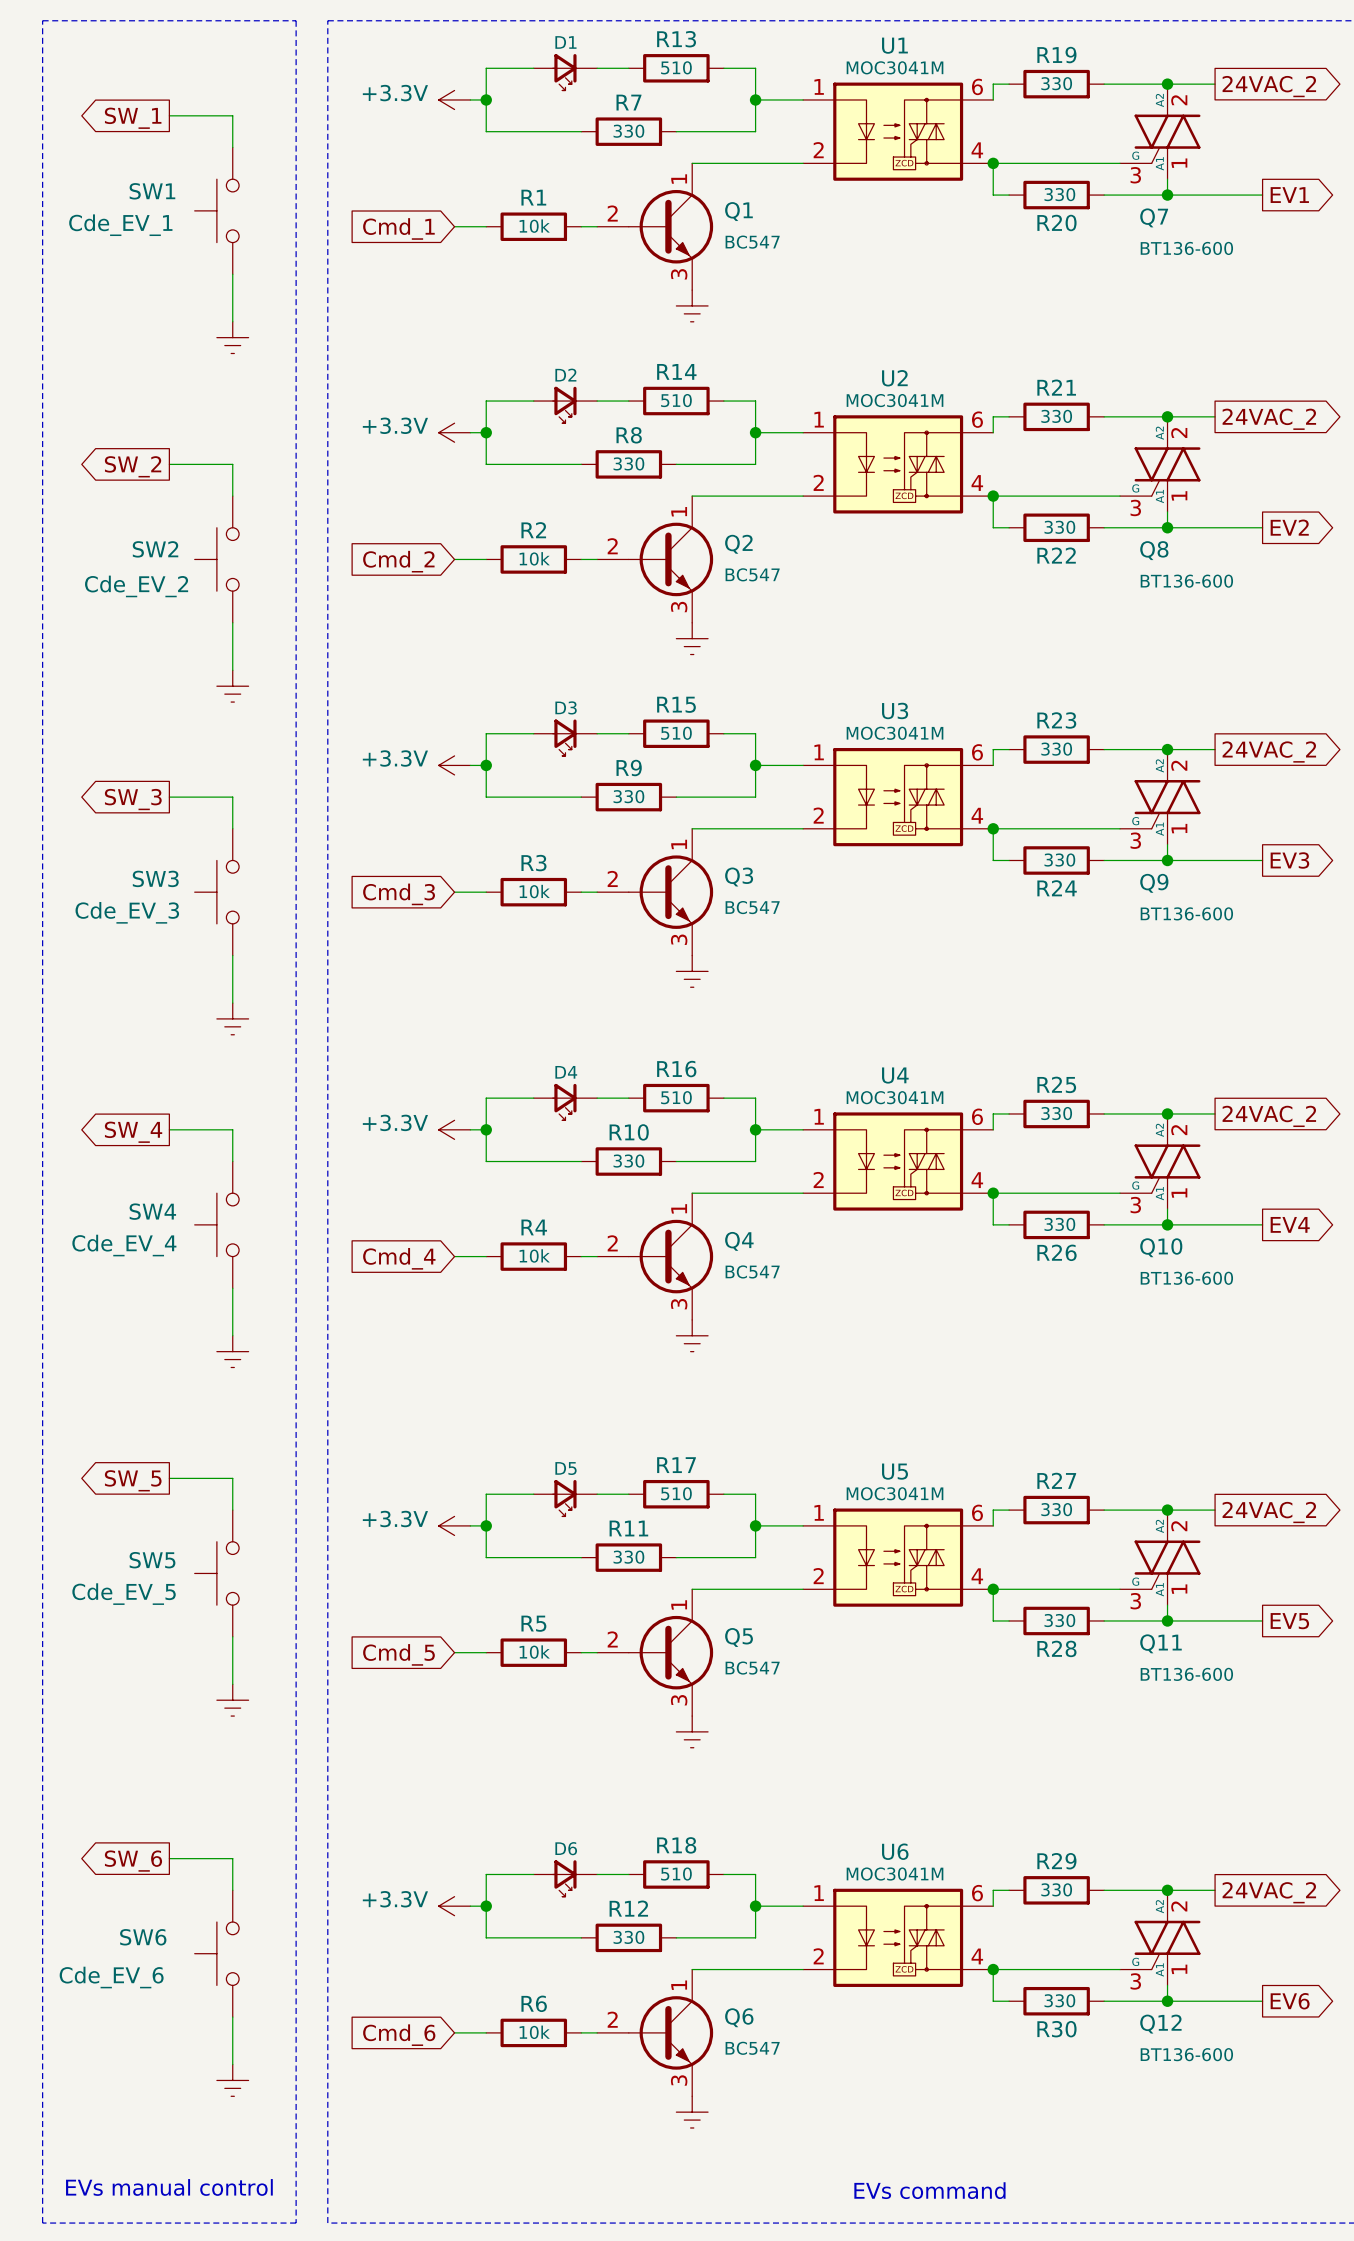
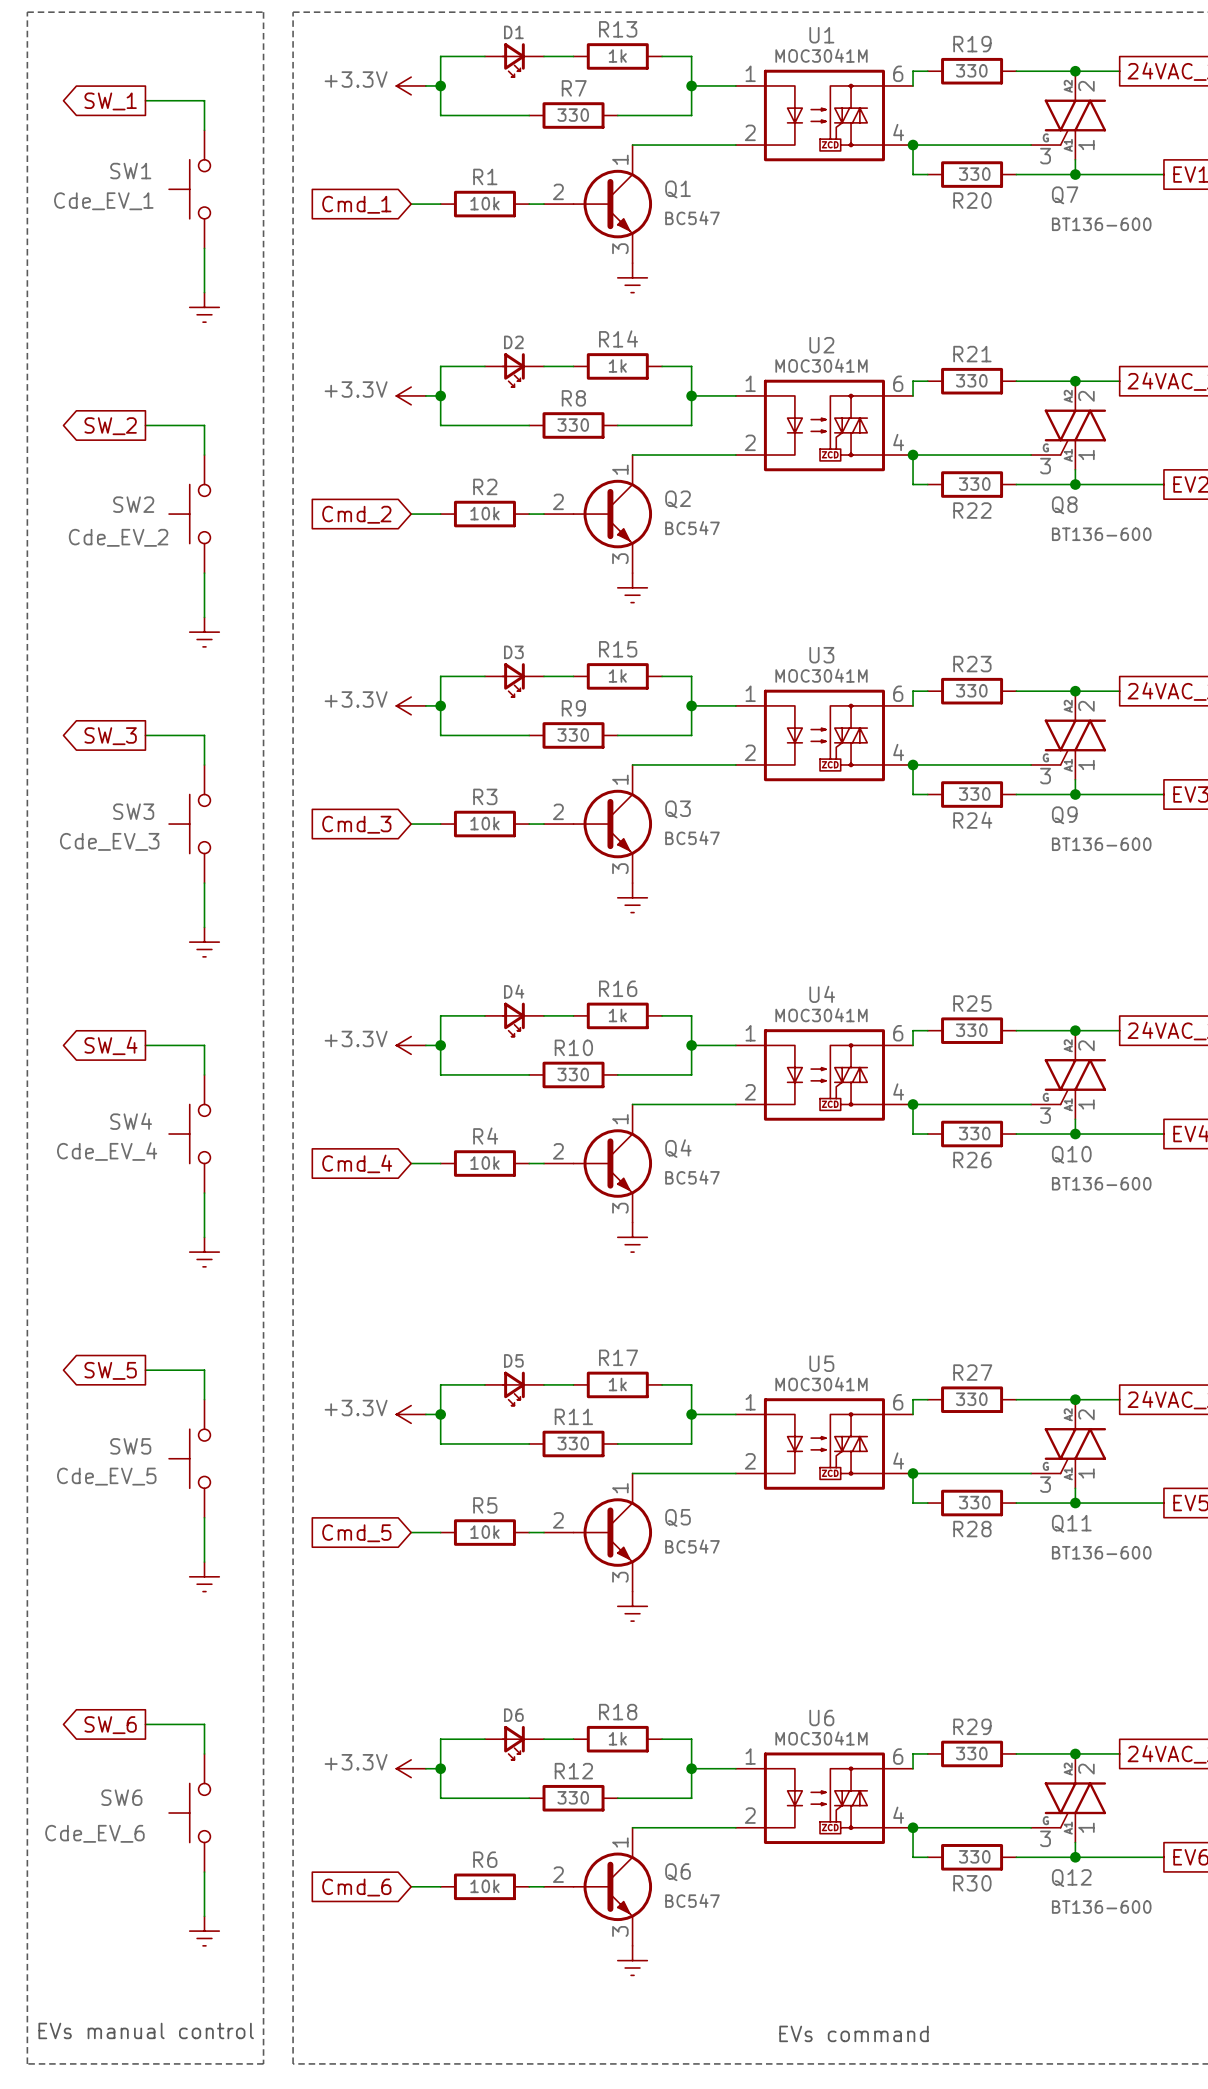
R13 value: 510 (676, 67) -> 1k (617, 56)
R14 value: 510 (676, 400) -> 1k (617, 366)
R15 value: 510 (676, 733) -> 1k (617, 675)
R16 value: 510 (676, 1097) -> 1k (617, 1015)
R17 value: 510 (676, 1493) -> 1k (617, 1384)
R18 value: 510 (676, 1874) -> 1k (617, 1738)

